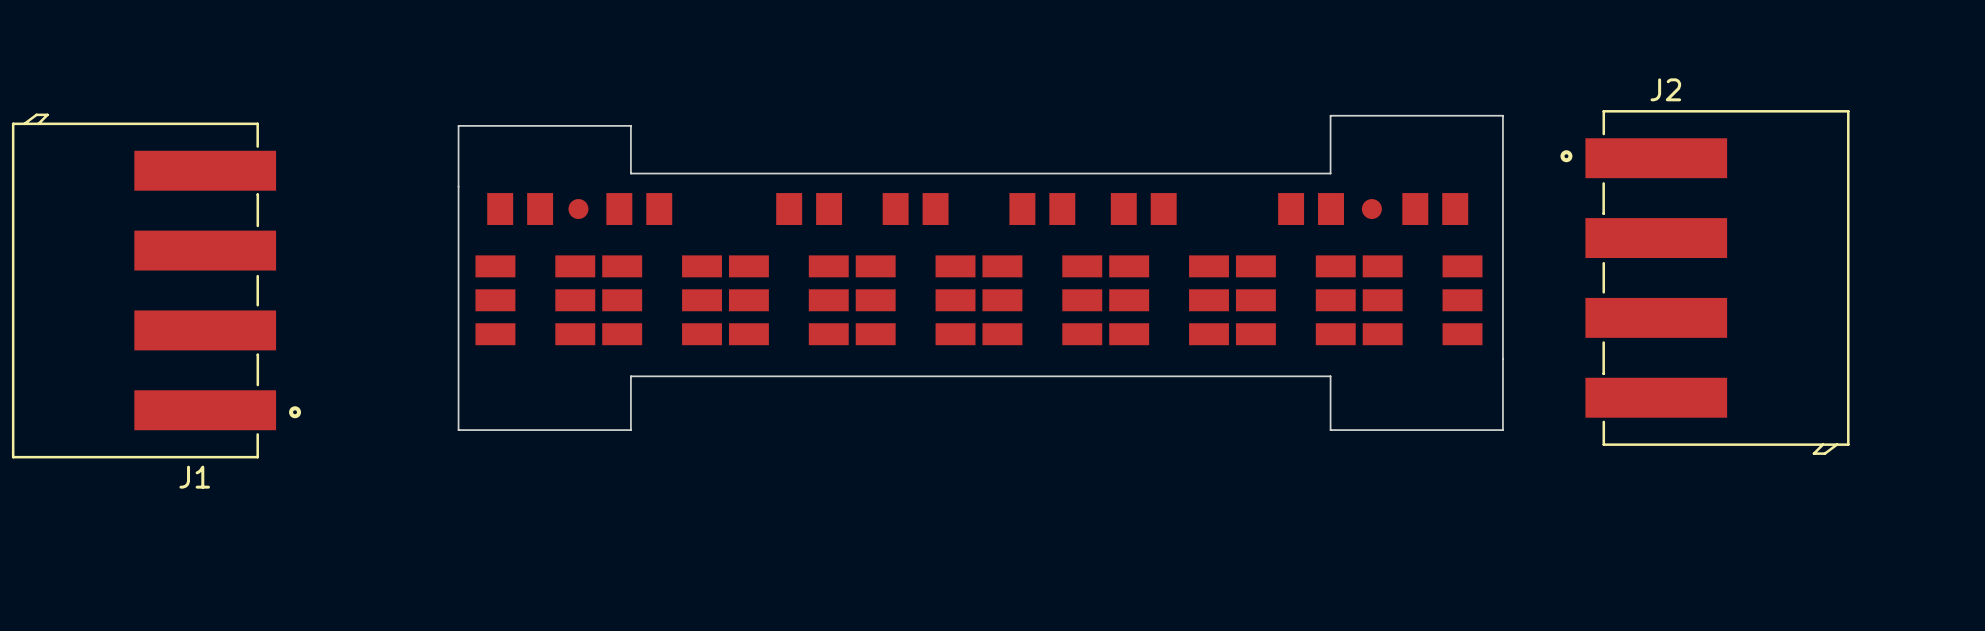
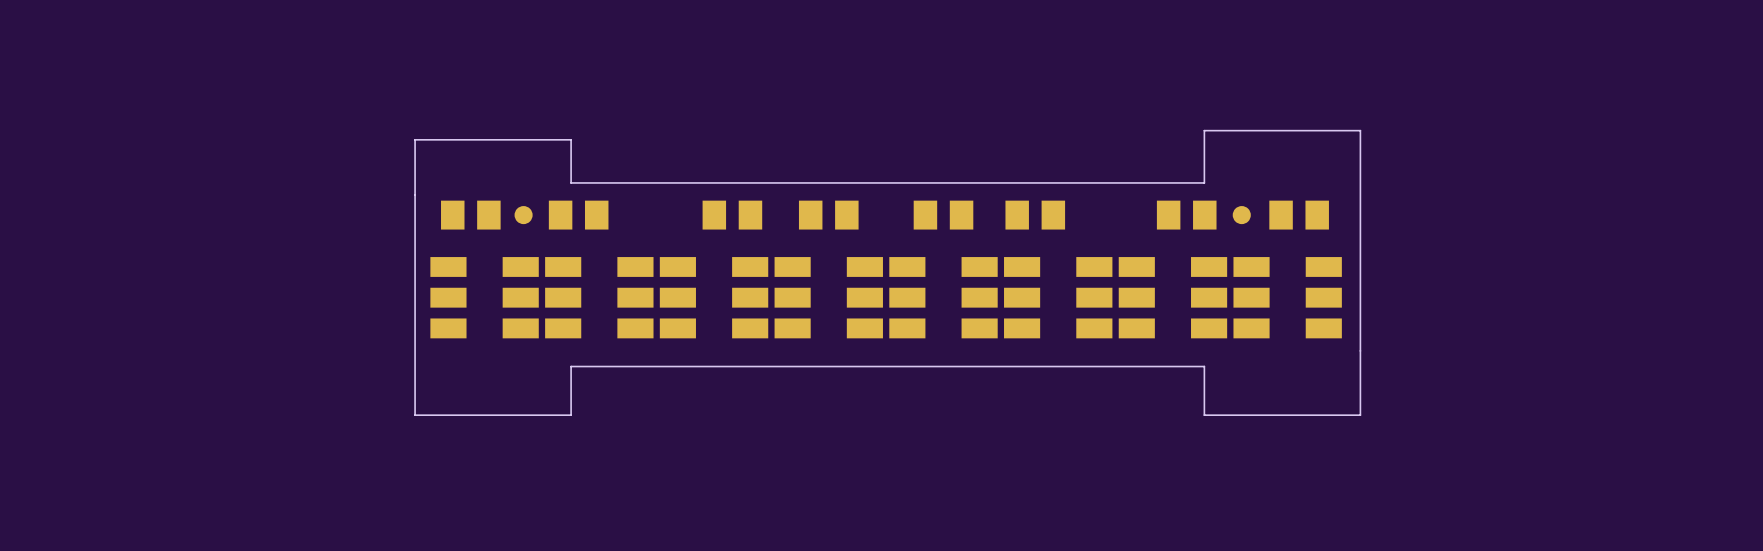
J2: (1705, 282) -> none
J1: (156, 286) -> none

